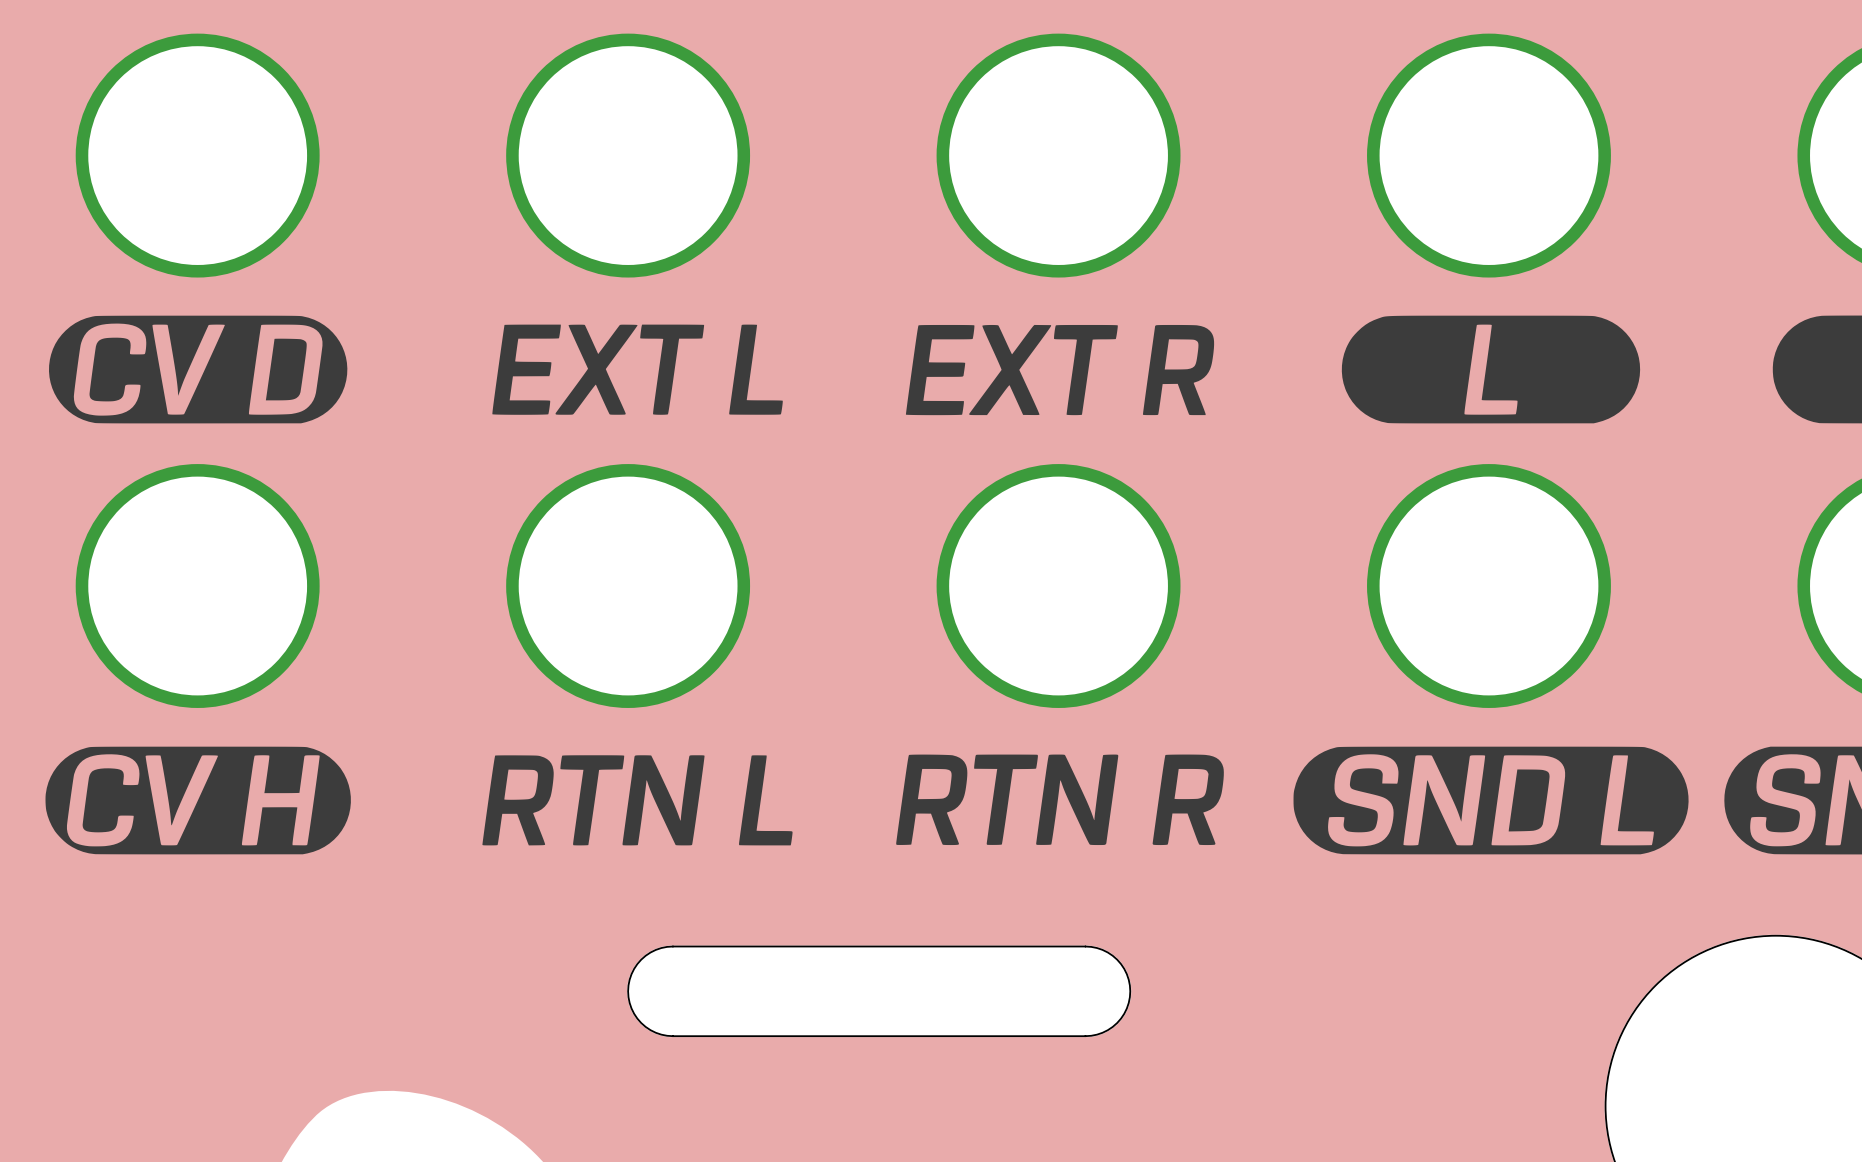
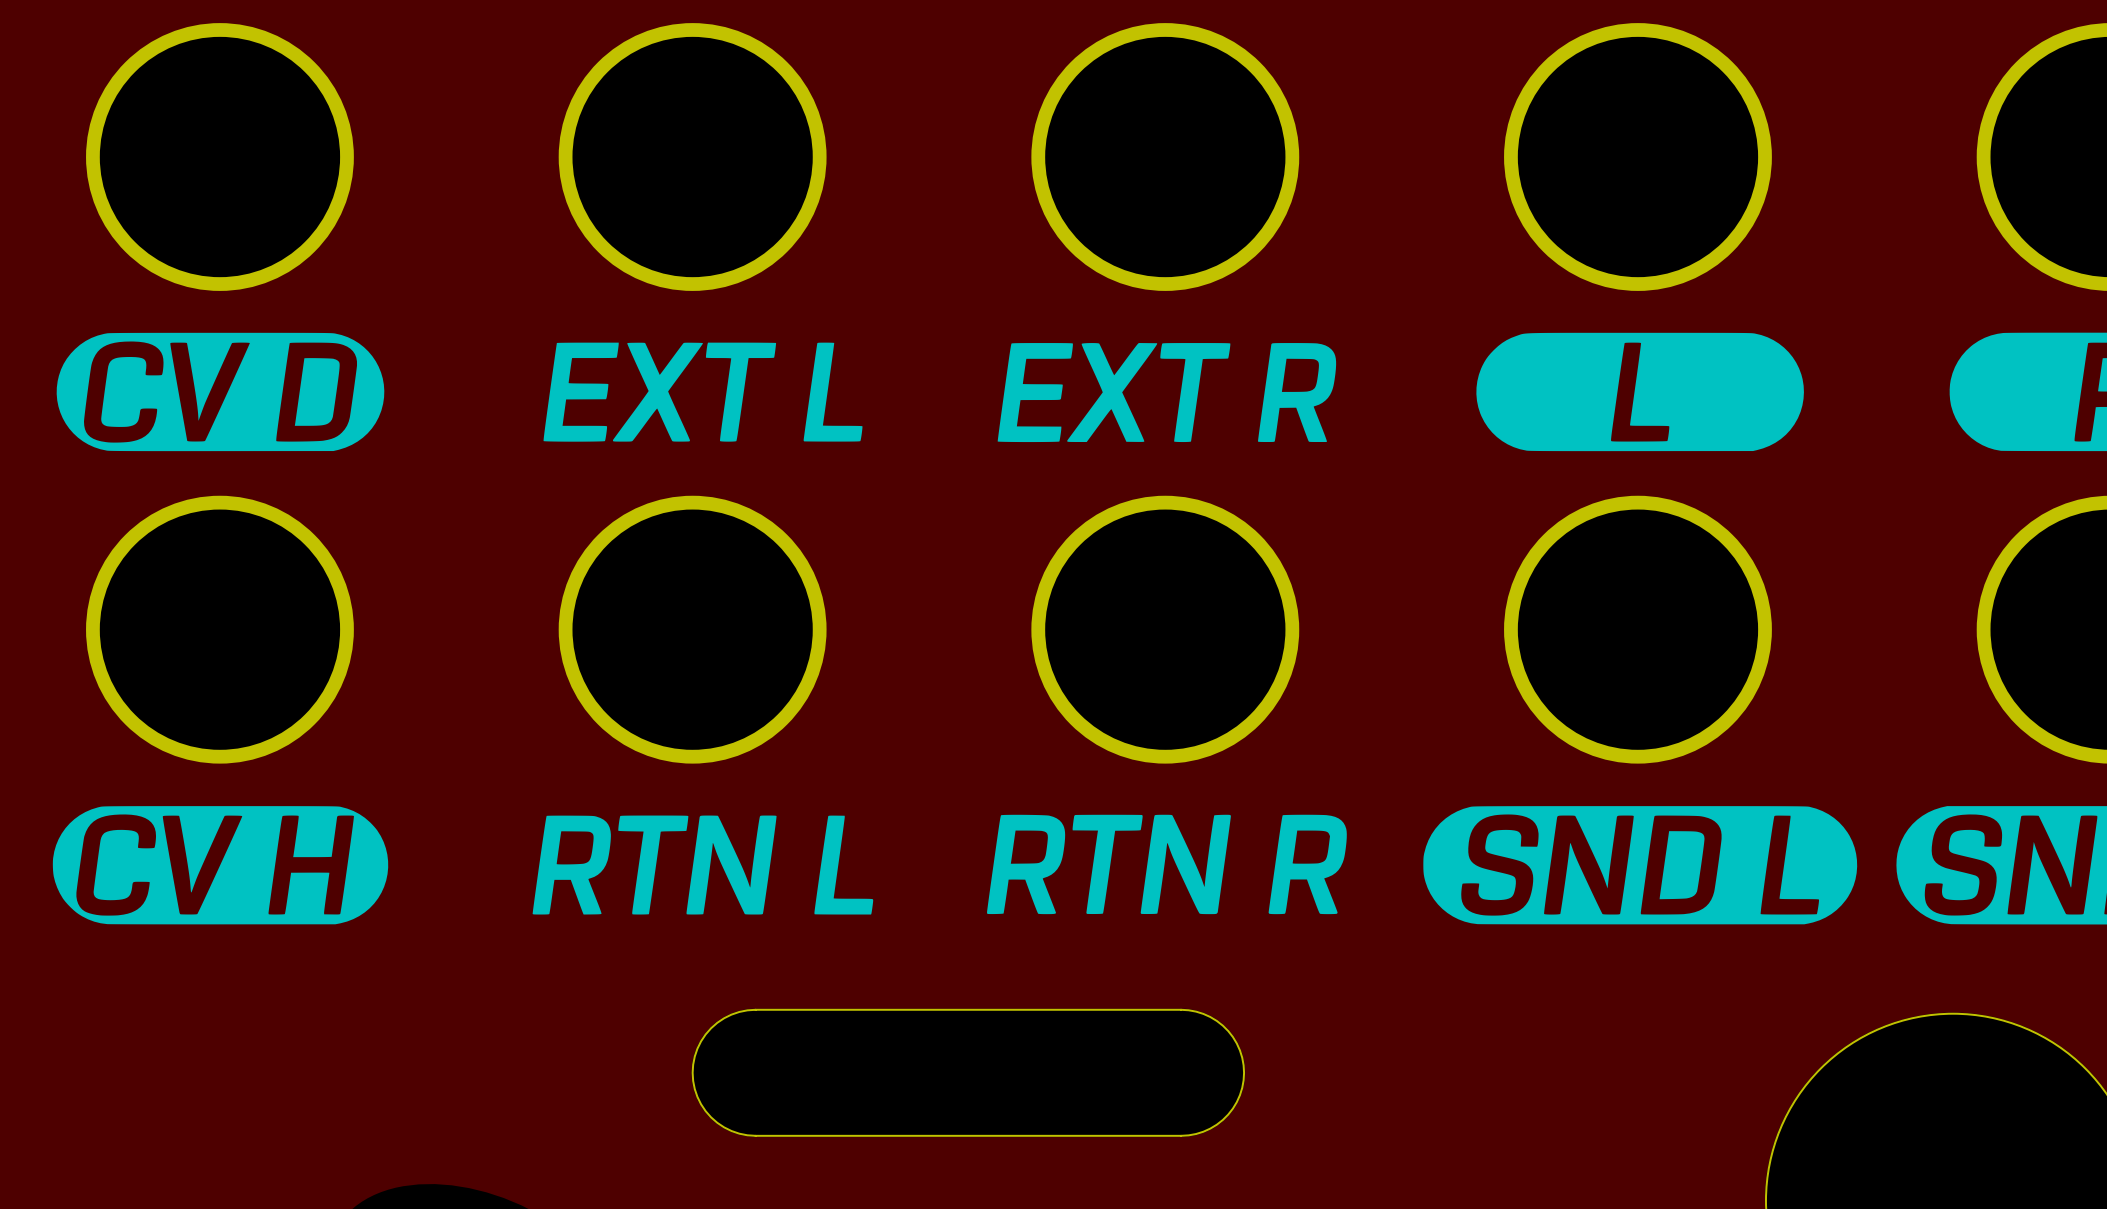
board edge: (672, 946) (1091, 946) (1107, 952) (1121, 964) (1128, 979) (1129, 997) (1126, 1008) (1117, 1023) (1107, 1030) (1091, 1035) (667, 1035) (650, 1030) (637, 1018) (629, 1002) (628, 985) (631, 974) (641, 959) (655, 949) (672, 946) -> (755, 1009) (731, 1014) (711, 1028) (697, 1048) (692, 1072) (697, 1096) (705, 1111) (724, 1127) (747, 1135) (1188, 1135) (1210, 1128) (1222, 1119) (1236, 1102) (1243, 1080) (1242, 1057) (1232, 1037) (1216, 1020) (1203, 1013) (1188, 1010) (755, 1009)

